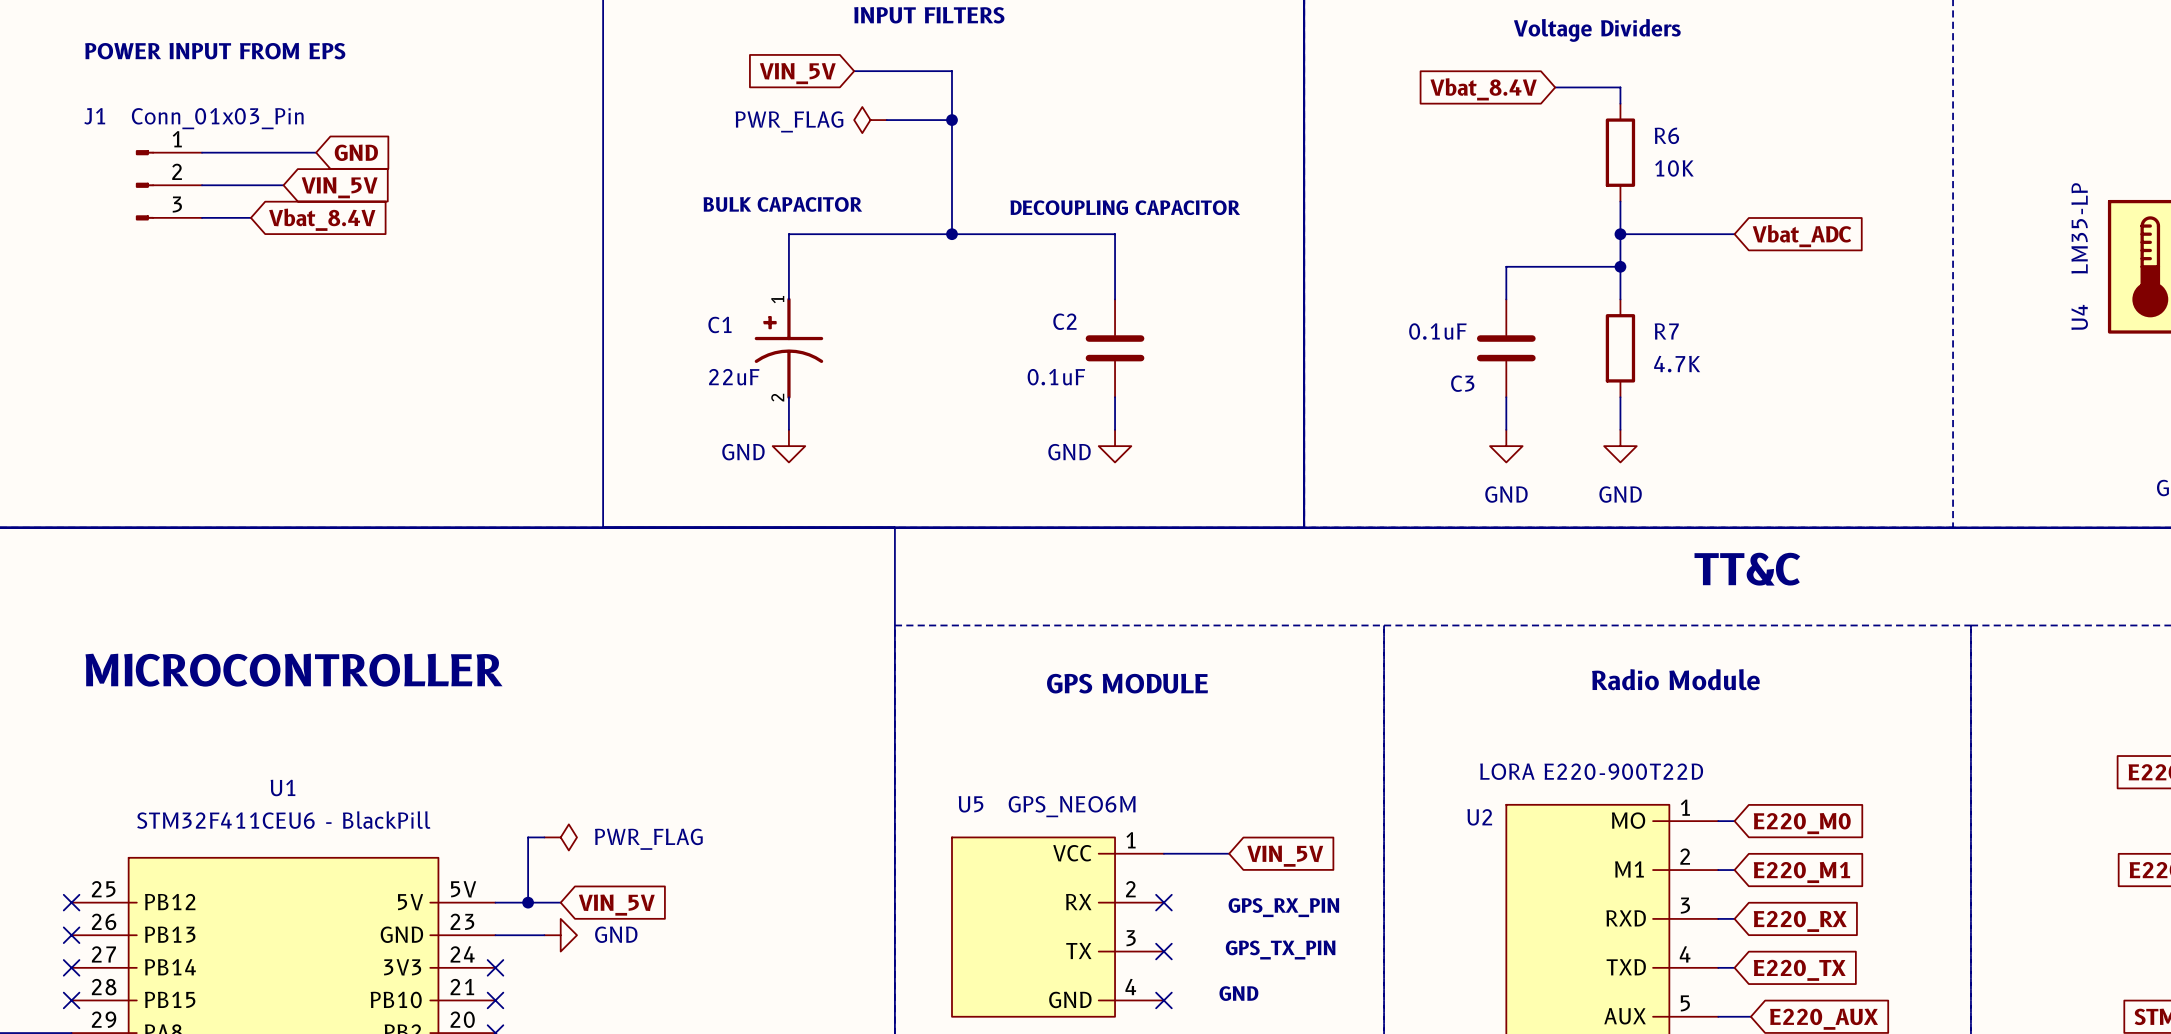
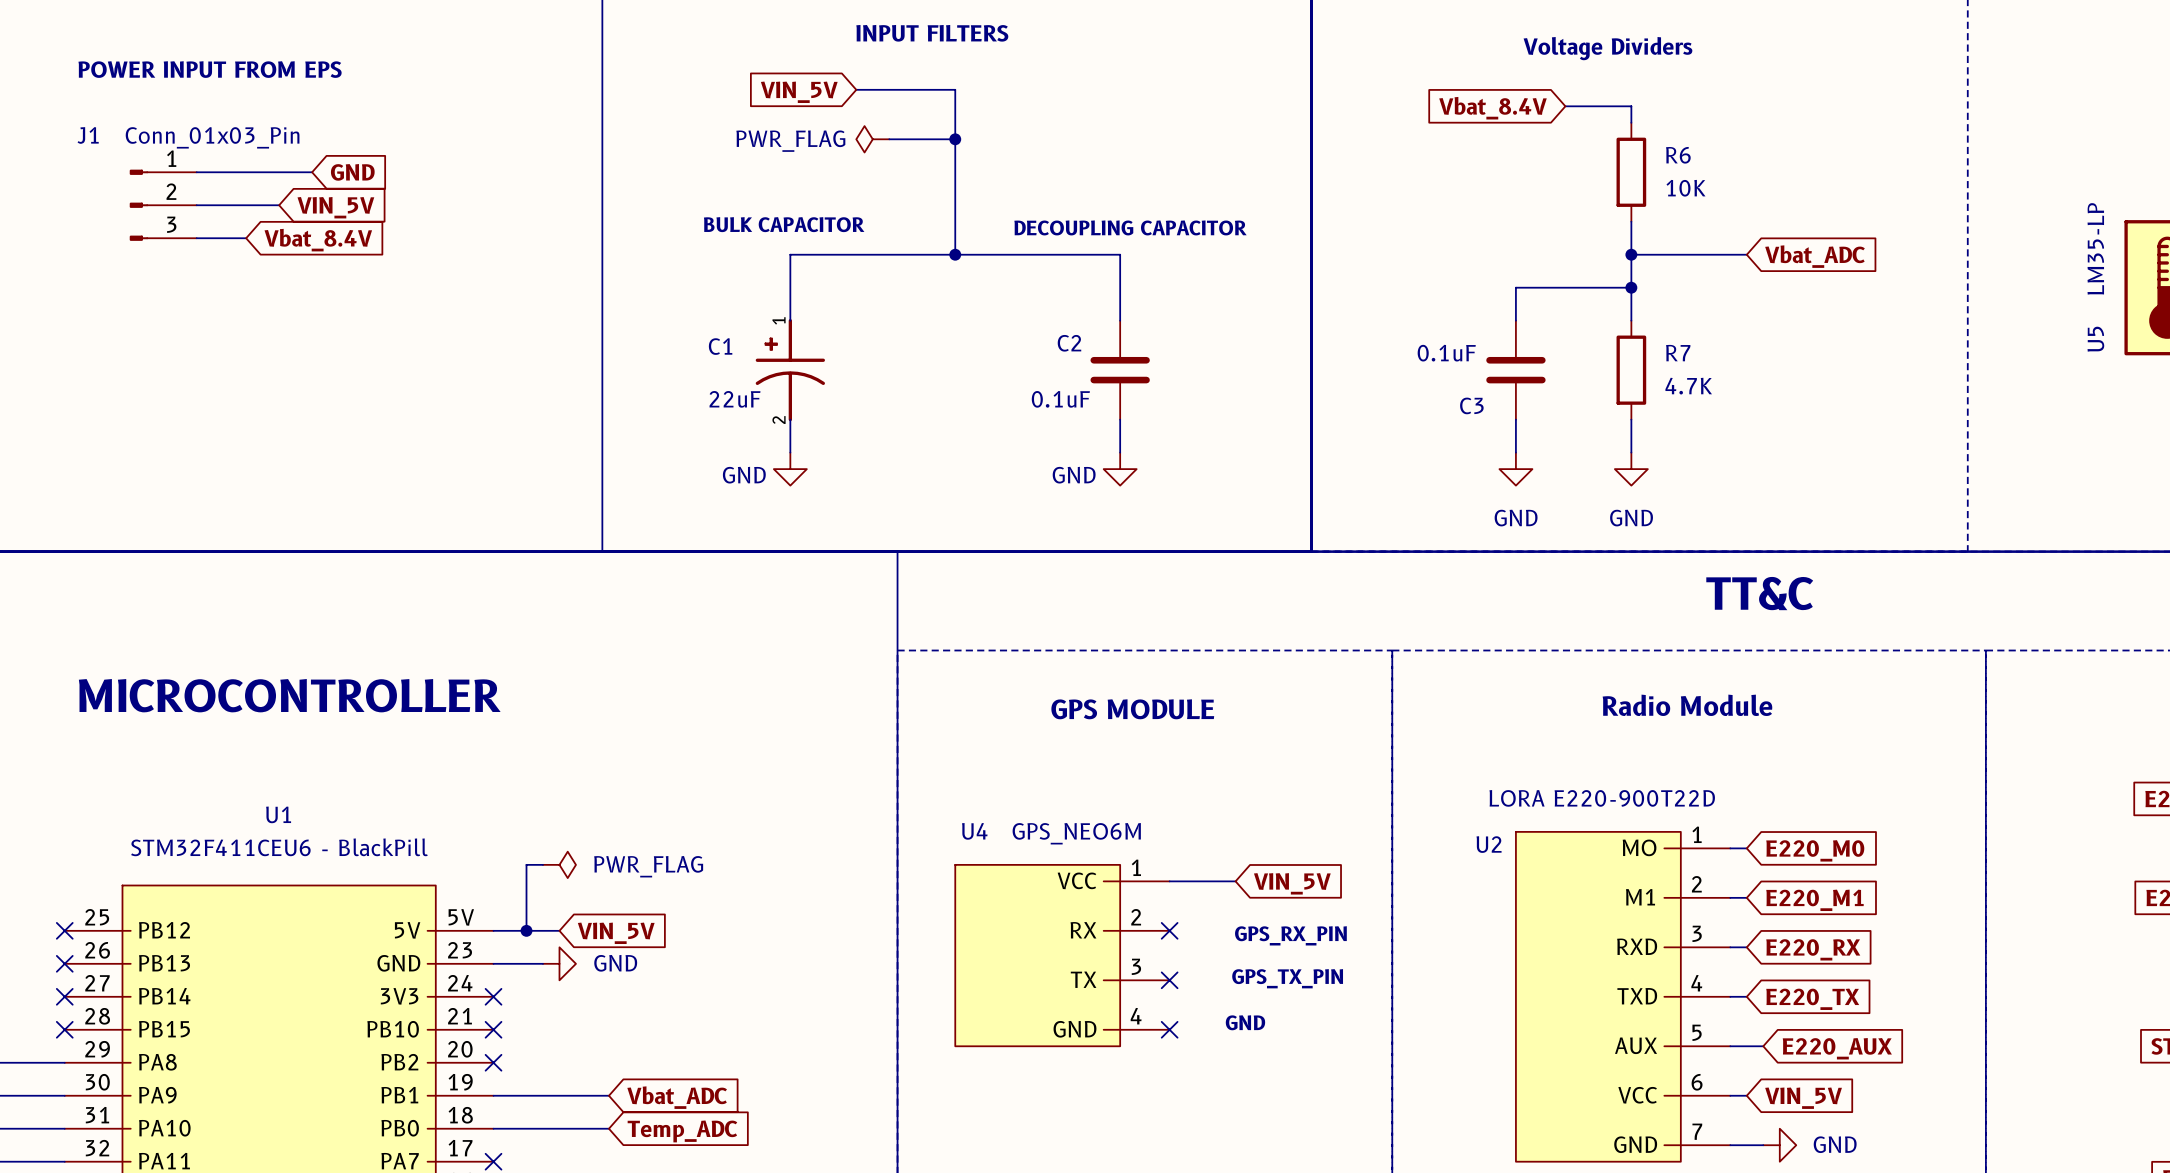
U4 name: U4 (2079, 317) -> U5 (2095, 339)
U5 name: U5 (971, 804) -> U4 (974, 831)

